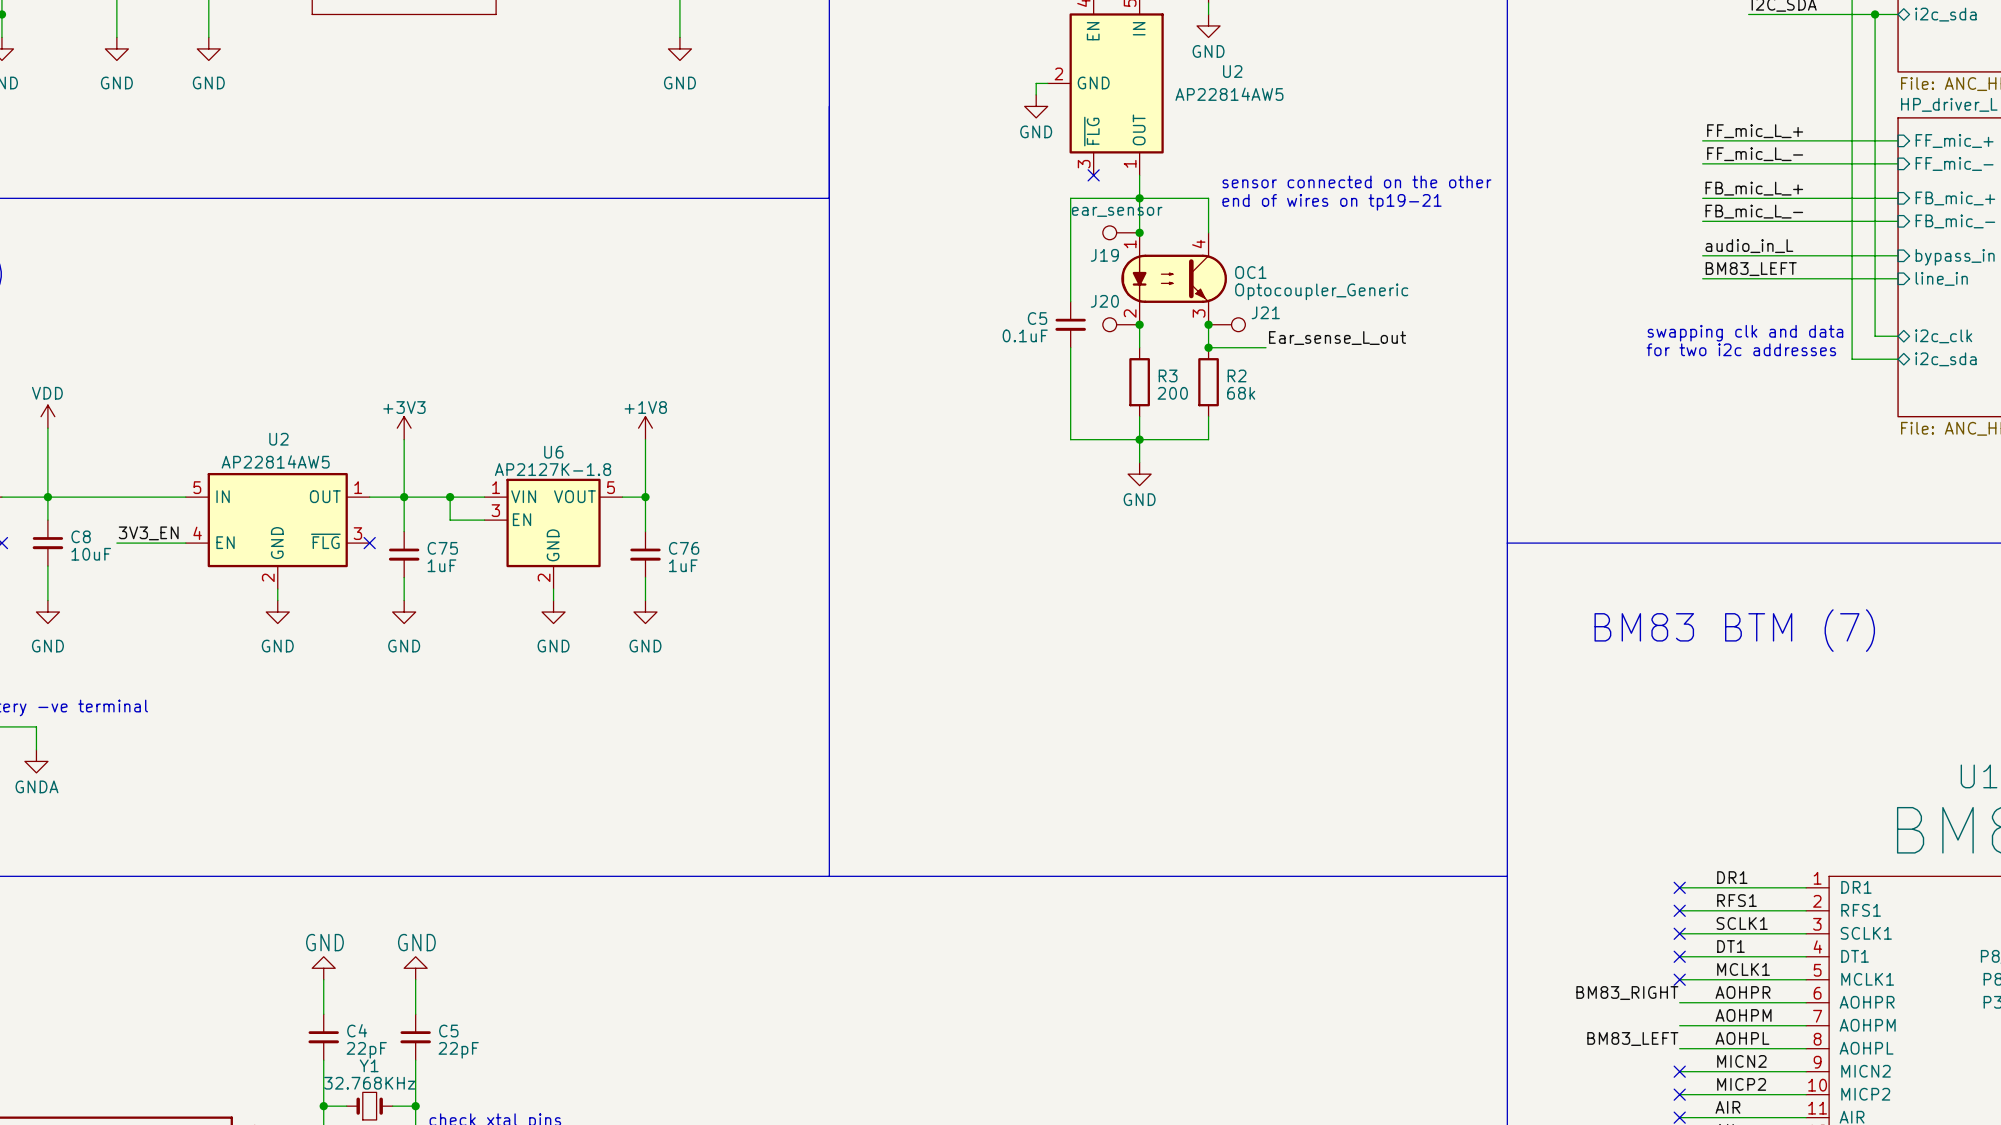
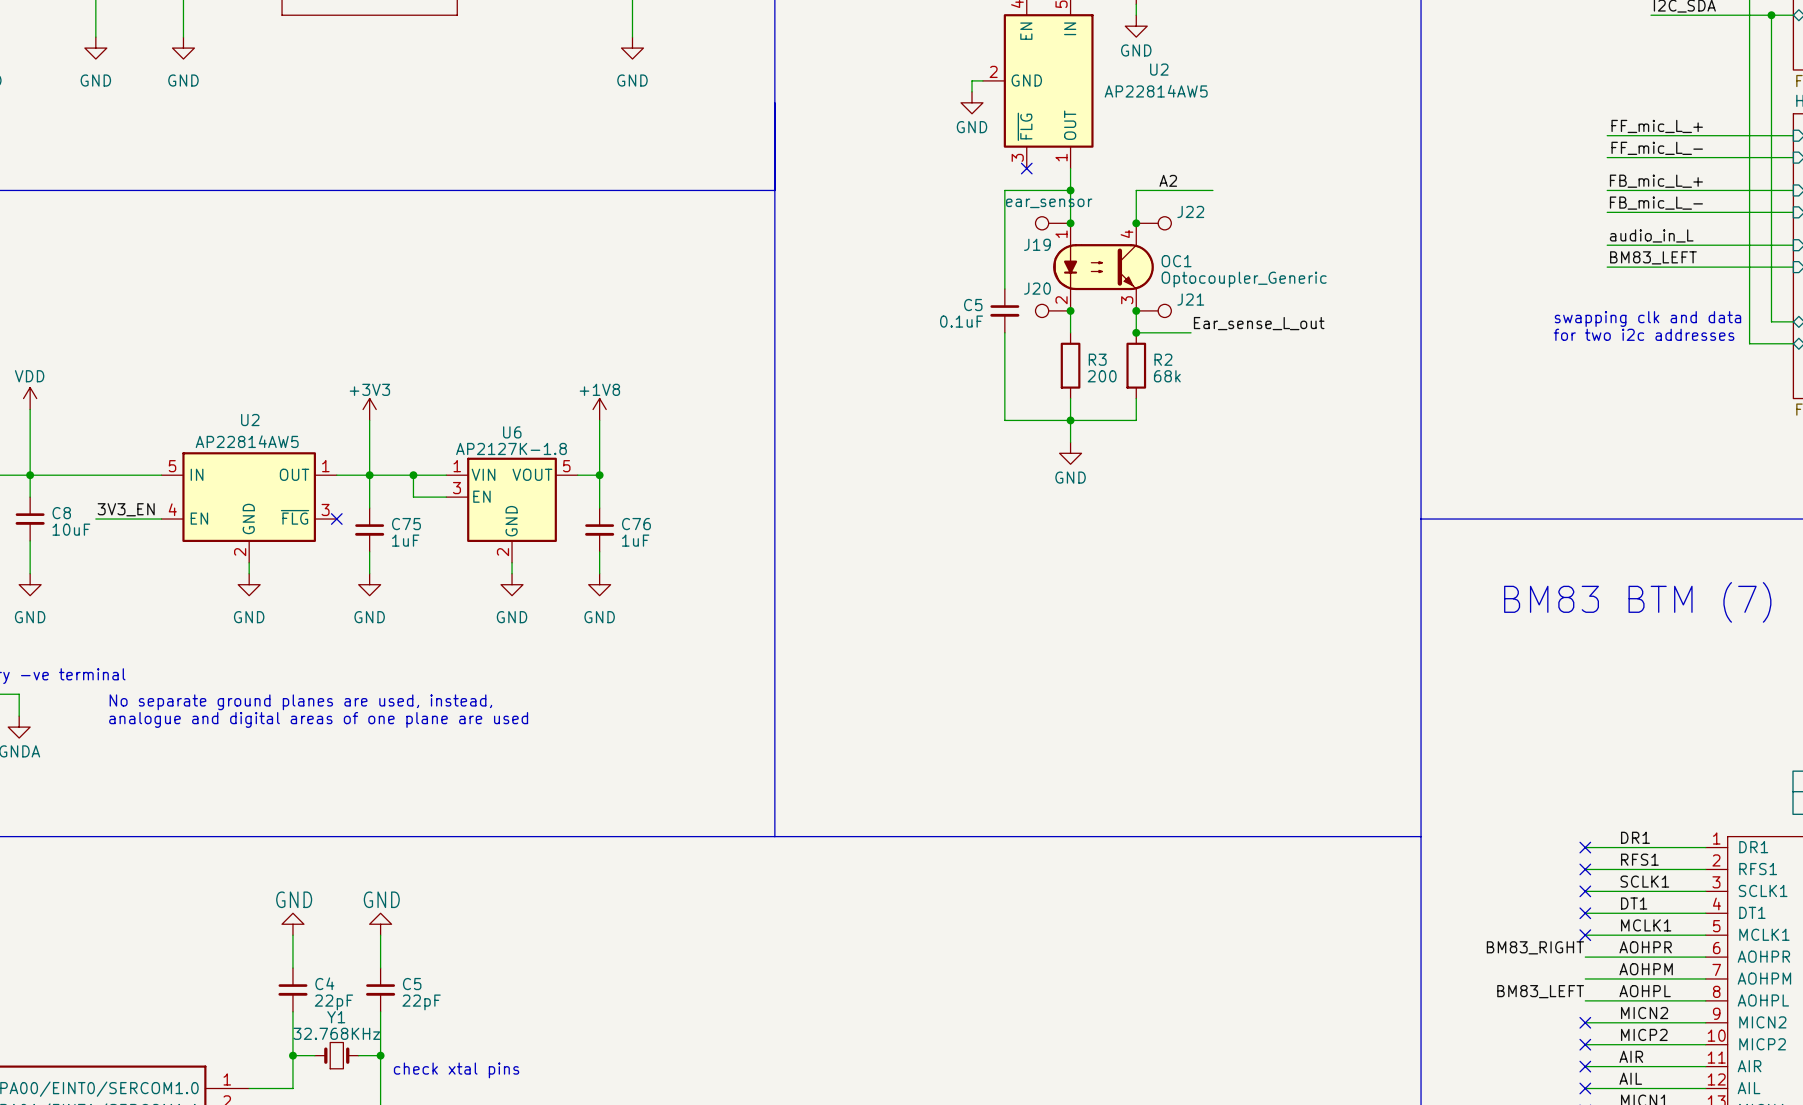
text: sensor connected on the other (1356, 181) -> none
label: none -> A2 (1168, 180)
wire: (1139, 198) (1208, 198) -> (1212, 190) (1136, 190)
text: end of wires on tp19-21 (1332, 202) -> none
junction: none -> (1136, 223)
J22: none -> (1153, 223)
text: none -> No separate ground planes are used, instead, (300, 702)
text: none -> analogue and digital areas of one plane are used (318, 719)

